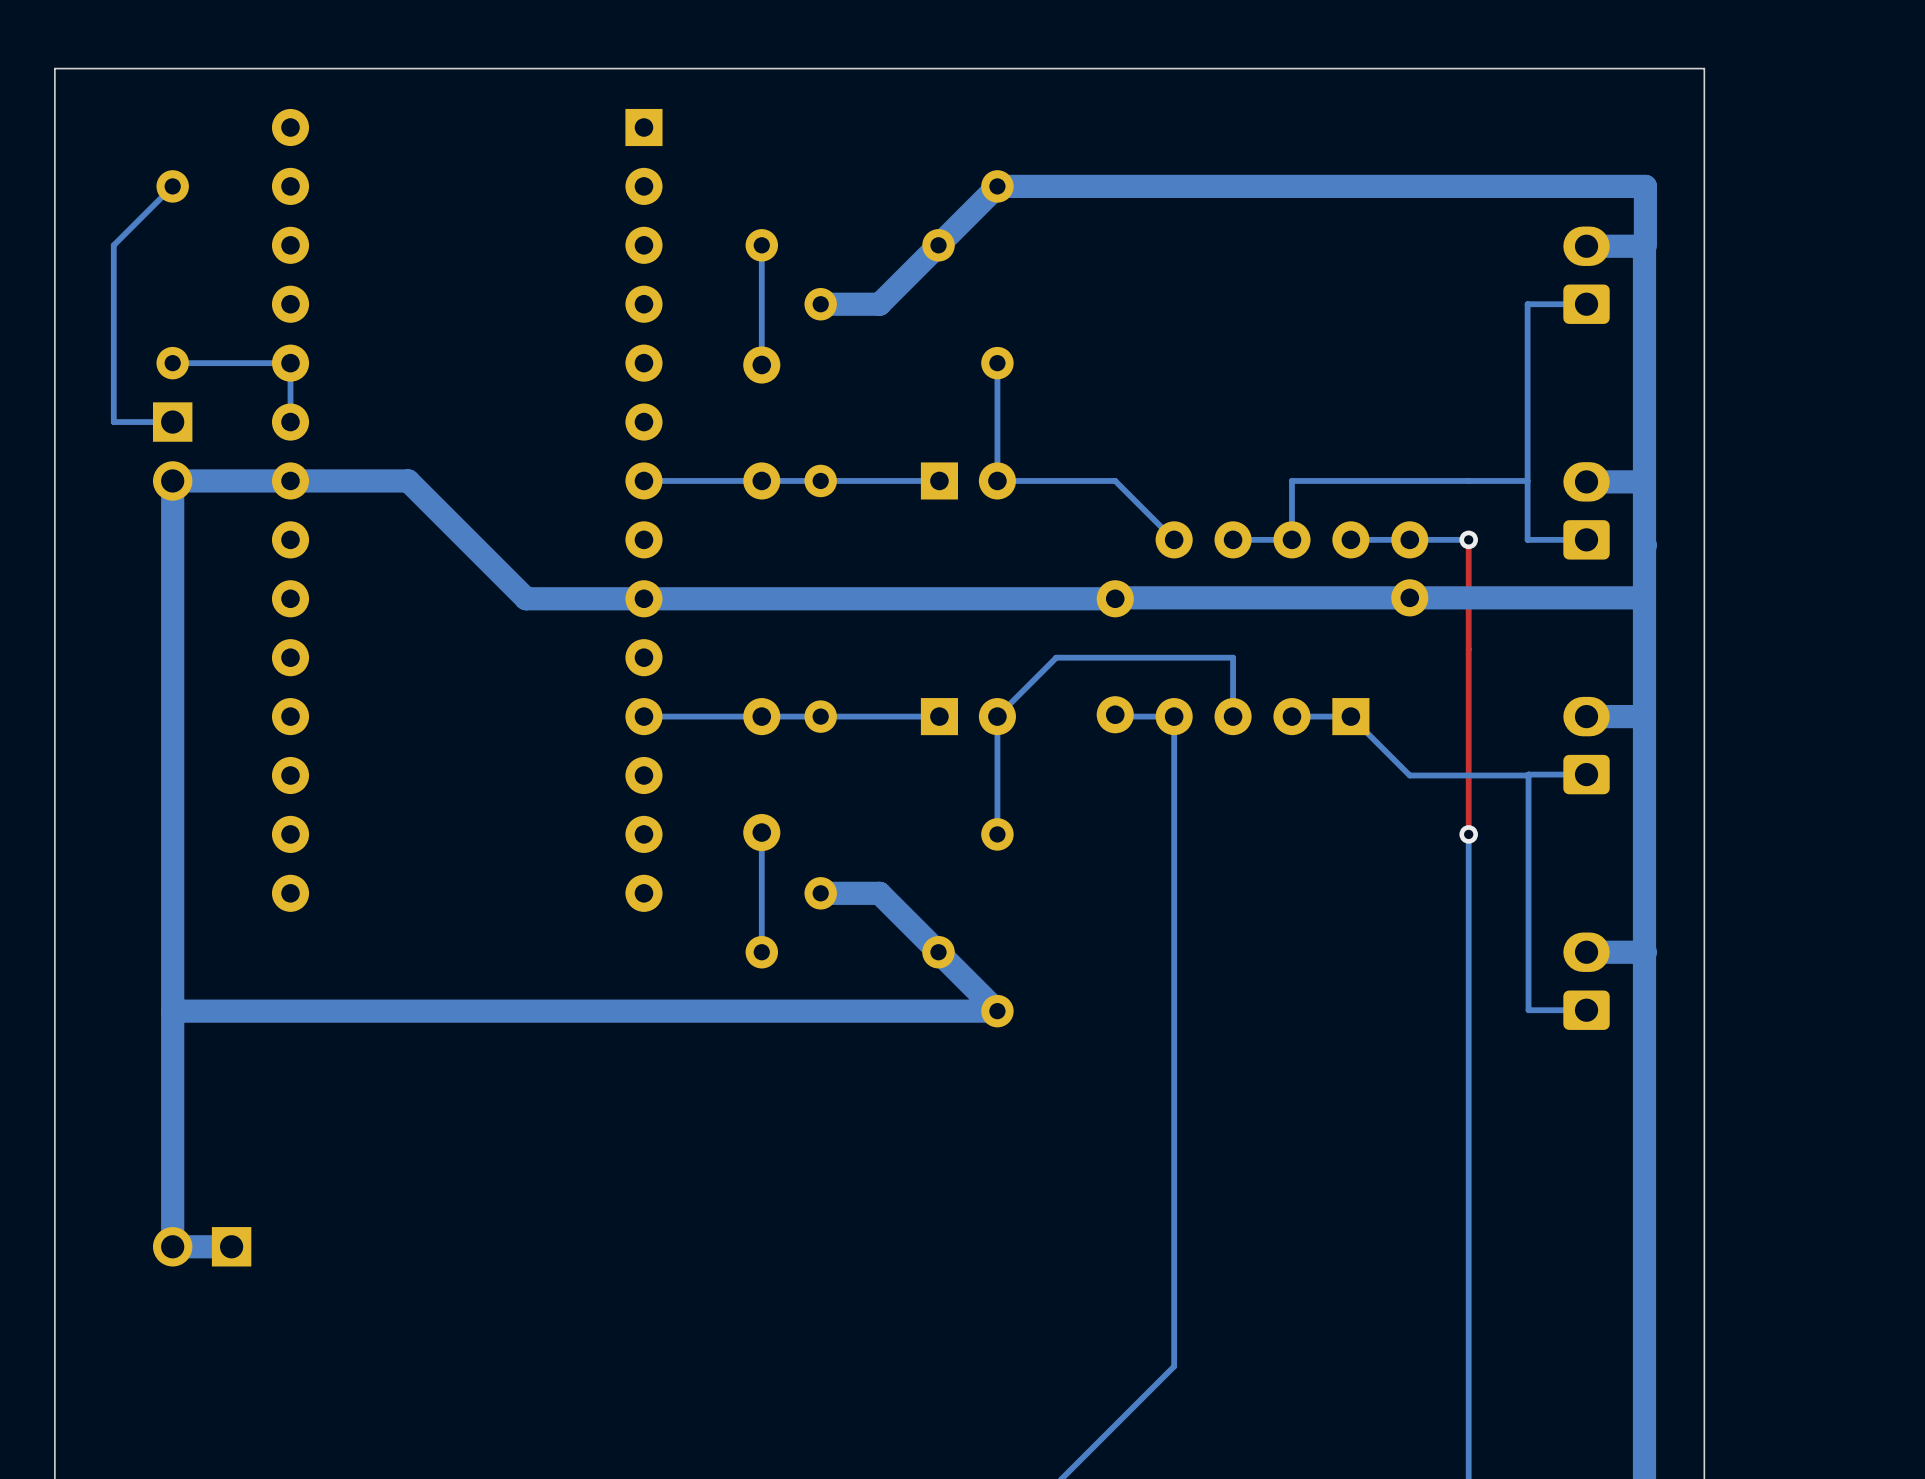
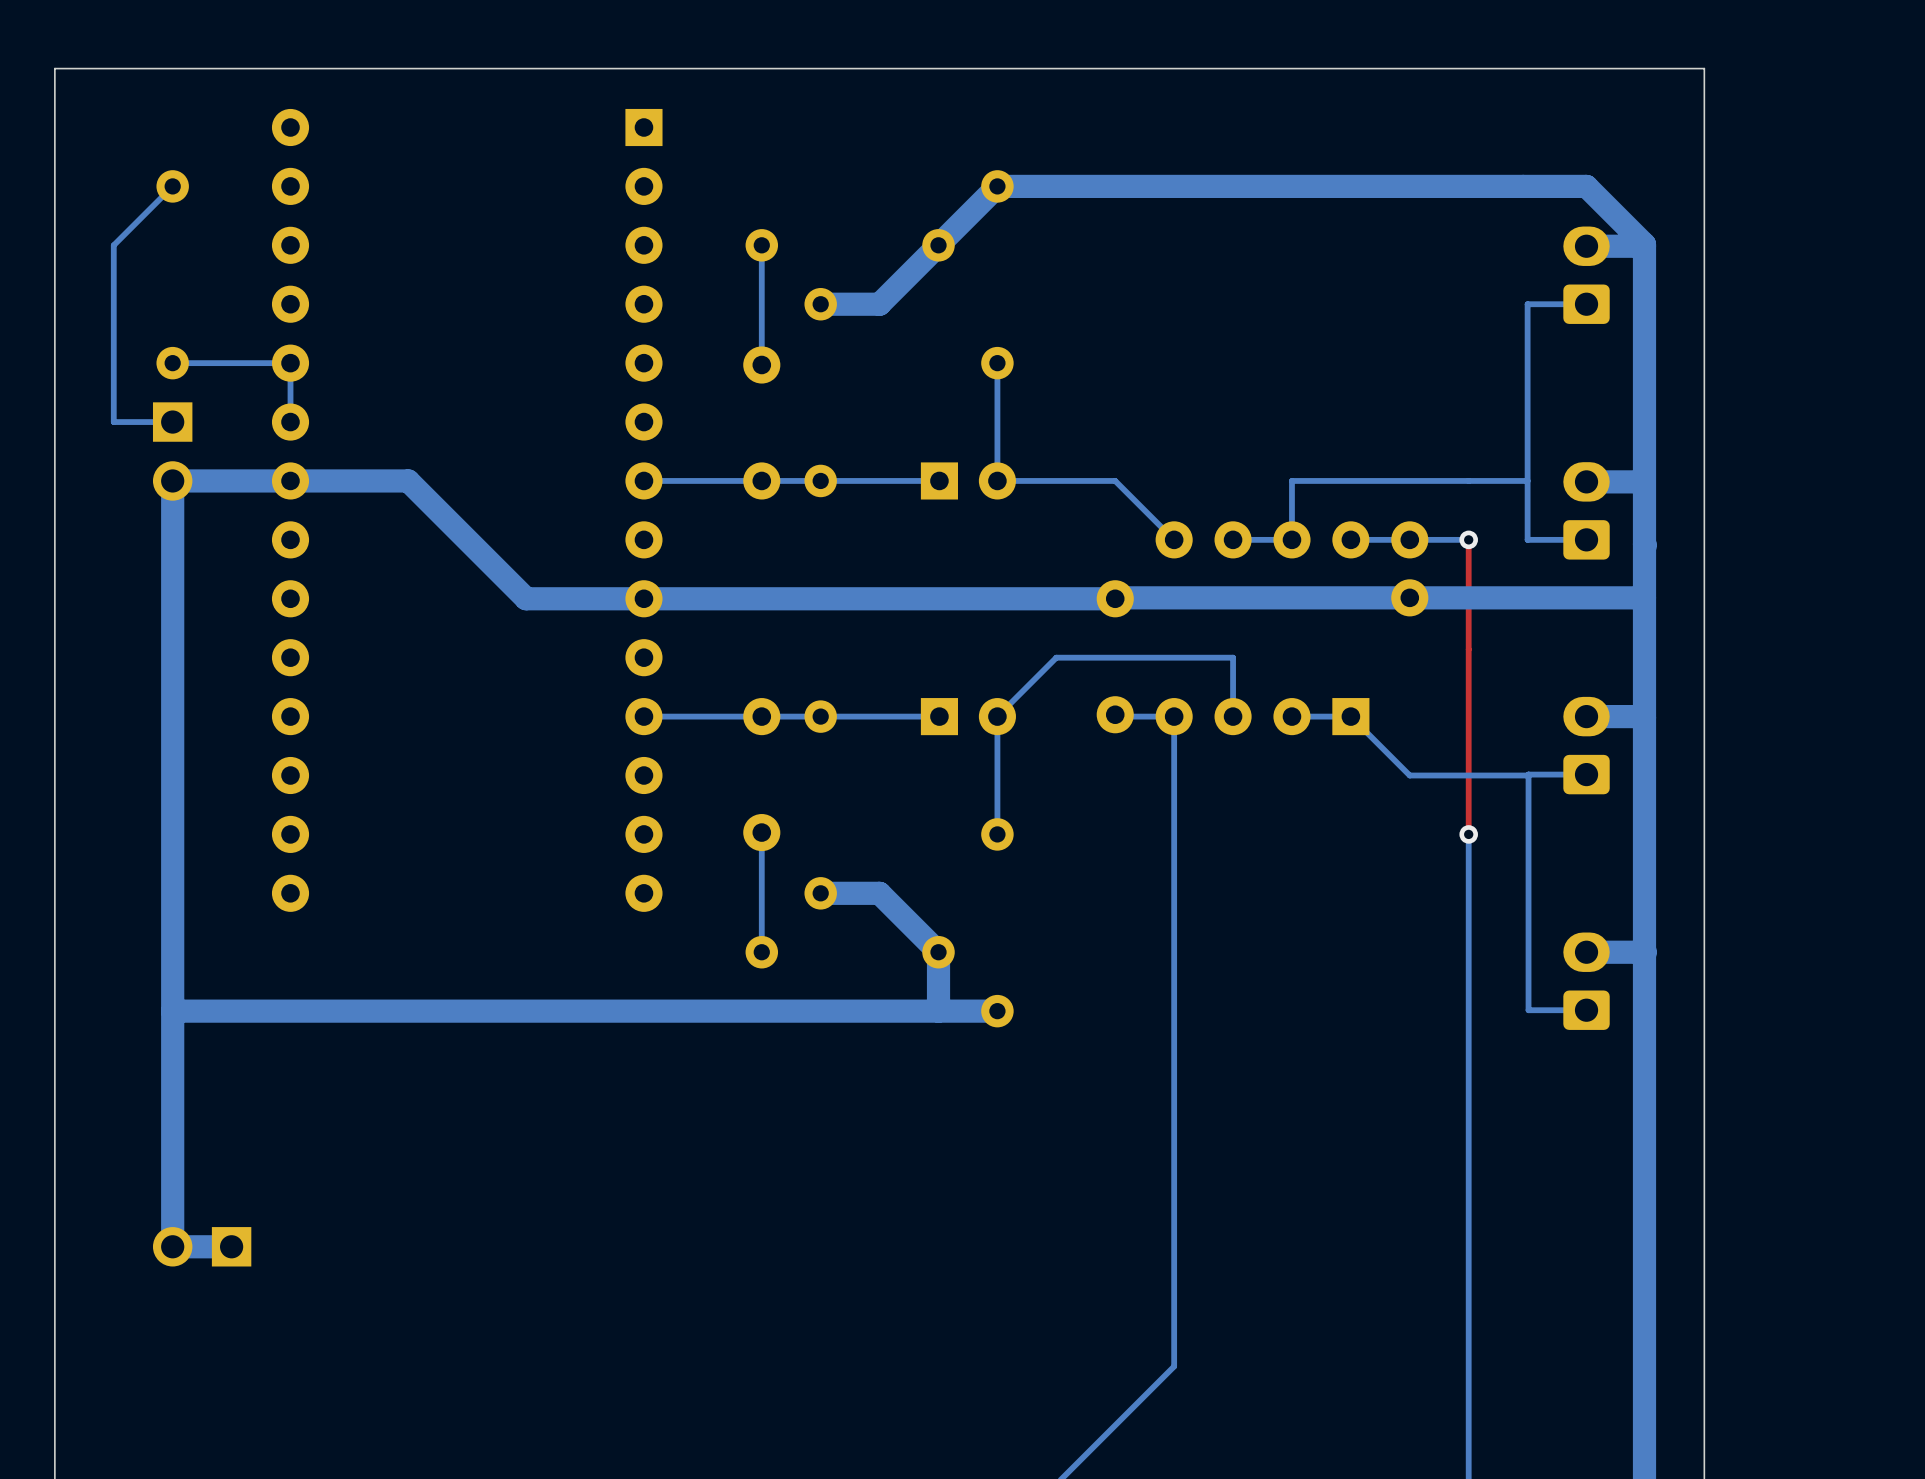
bottom track: (1586, 186) (1645, 186) (1645, 245) -> (1586, 186) (1644, 246)
bottom track: (938, 952) (997, 1011) -> (938, 952) (938, 1011)

